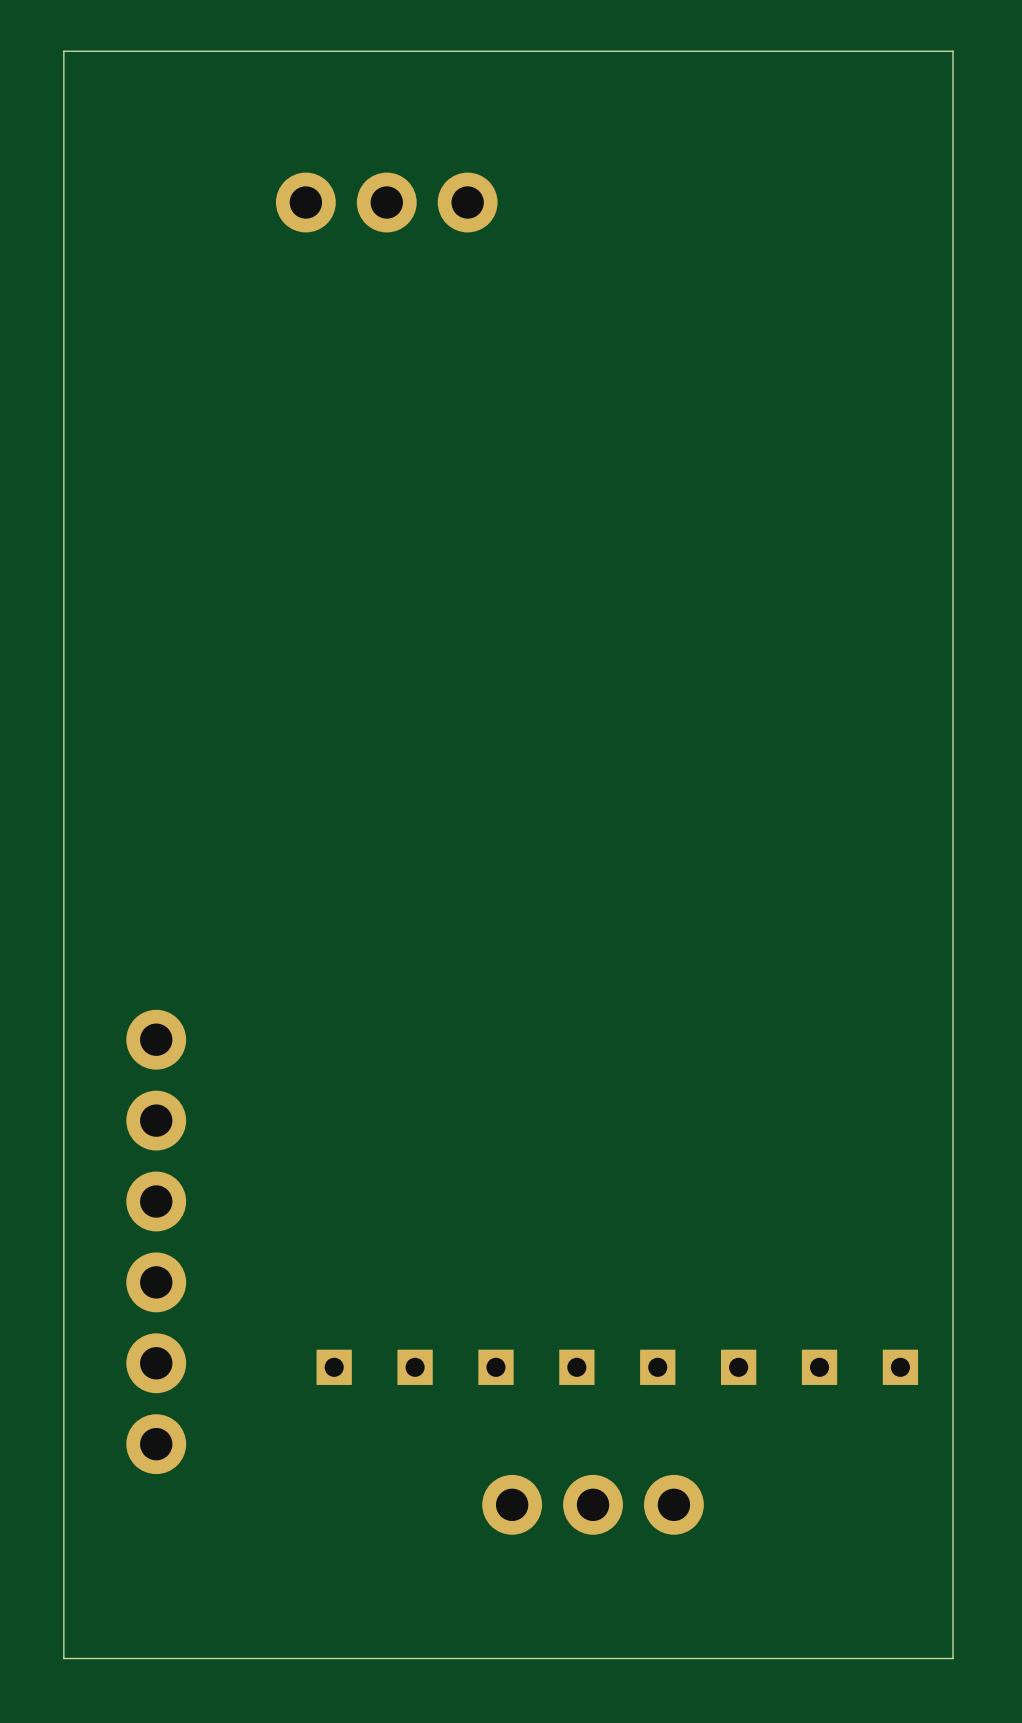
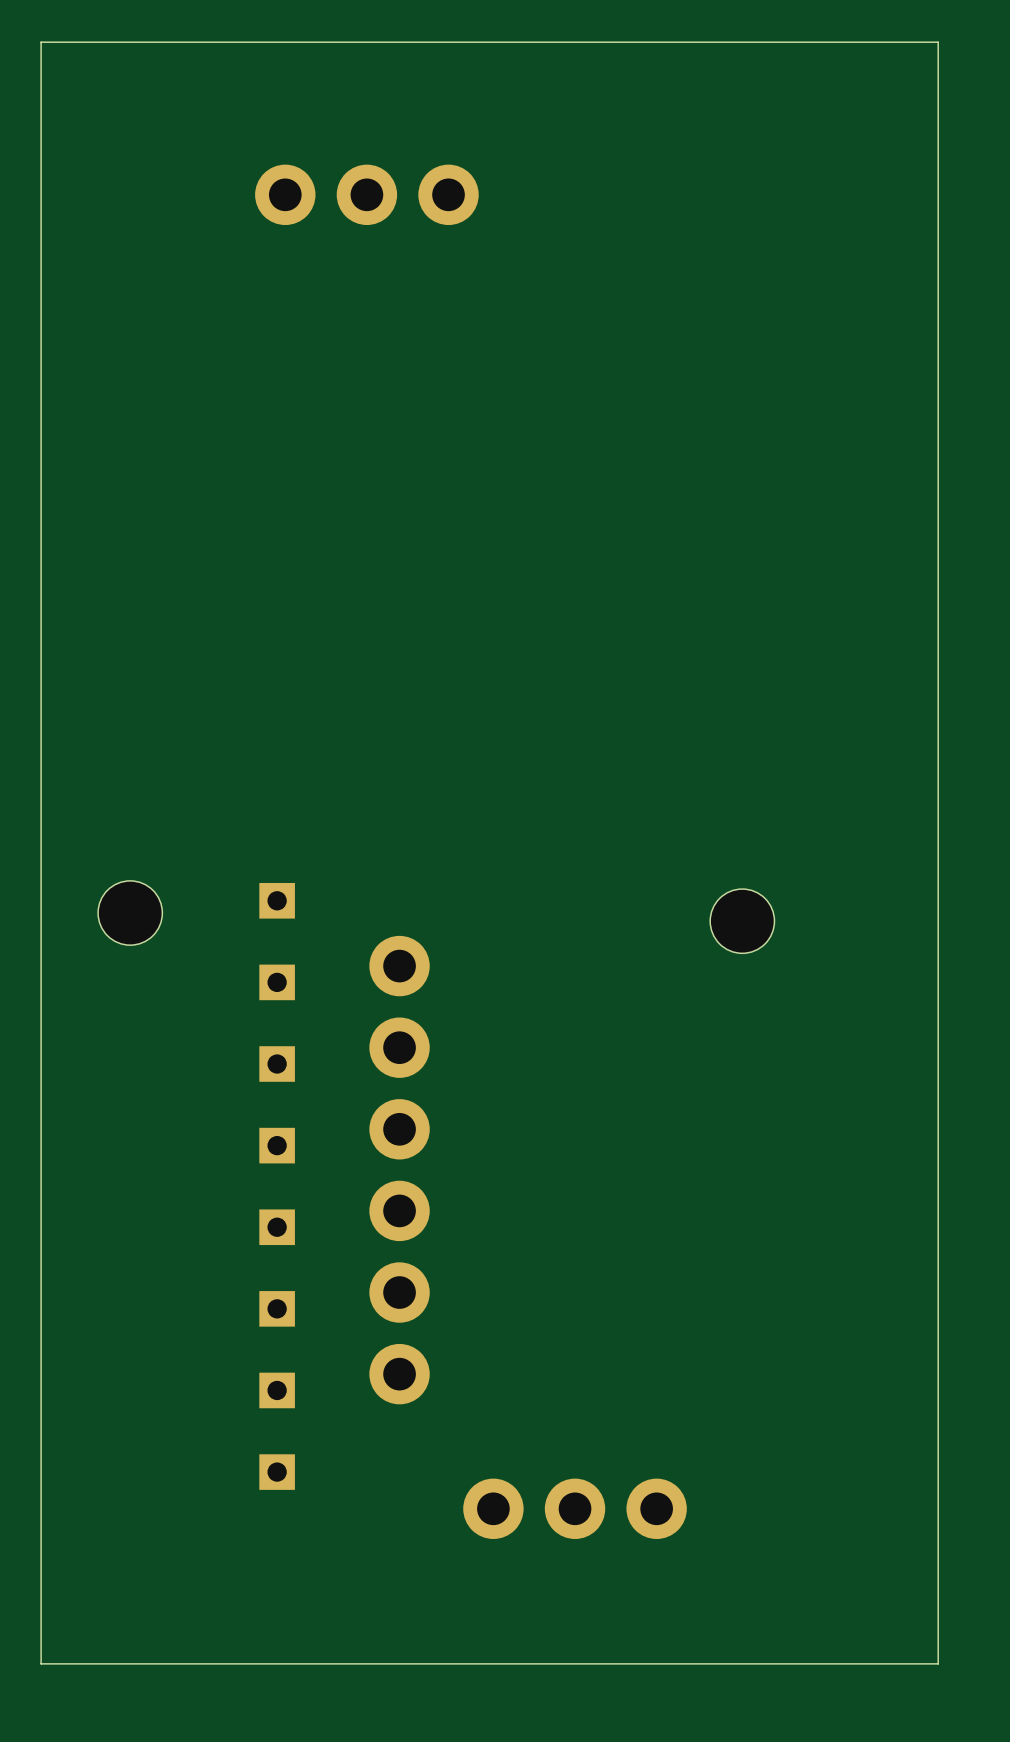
hole: none -> (130, 913)
hole: none -> (742, 921)
part position: (156, 1241) -> (399, 1170)
part rotation: 0° (617, 1367) -> 90° clockwise (277, 1186)
part position: (617, 1367) -> (277, 1186)

